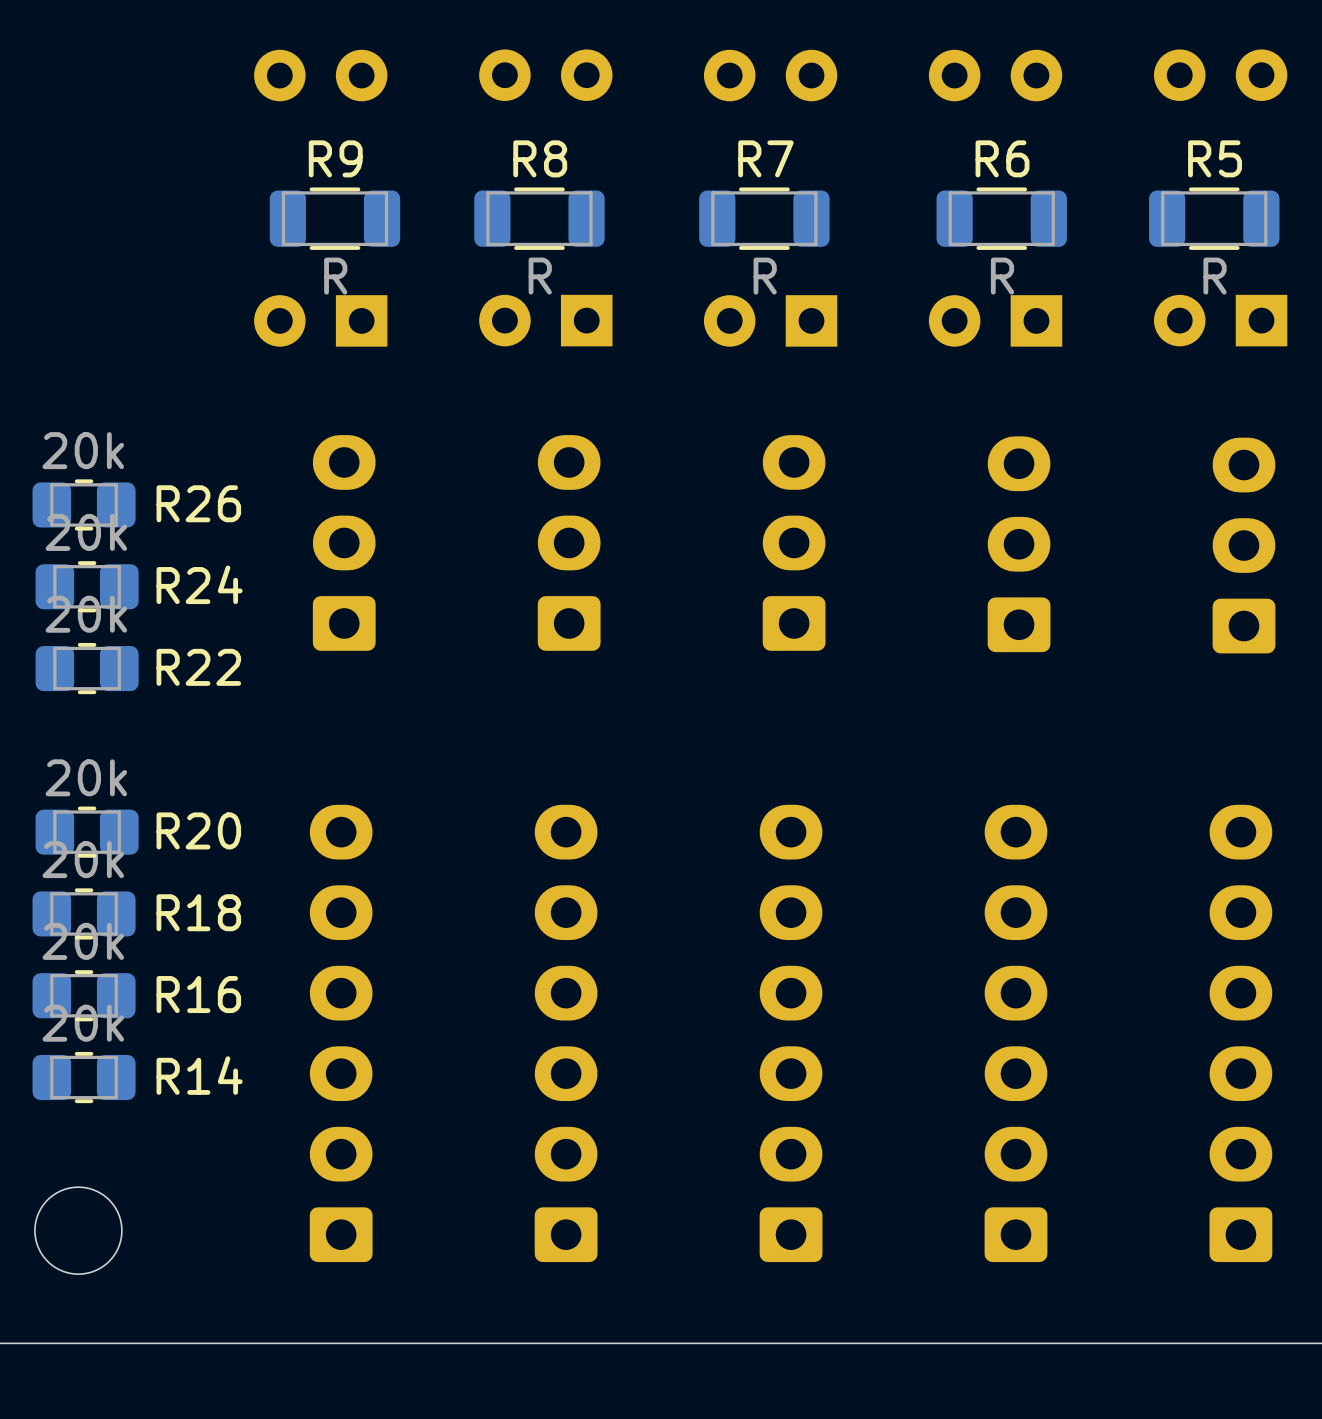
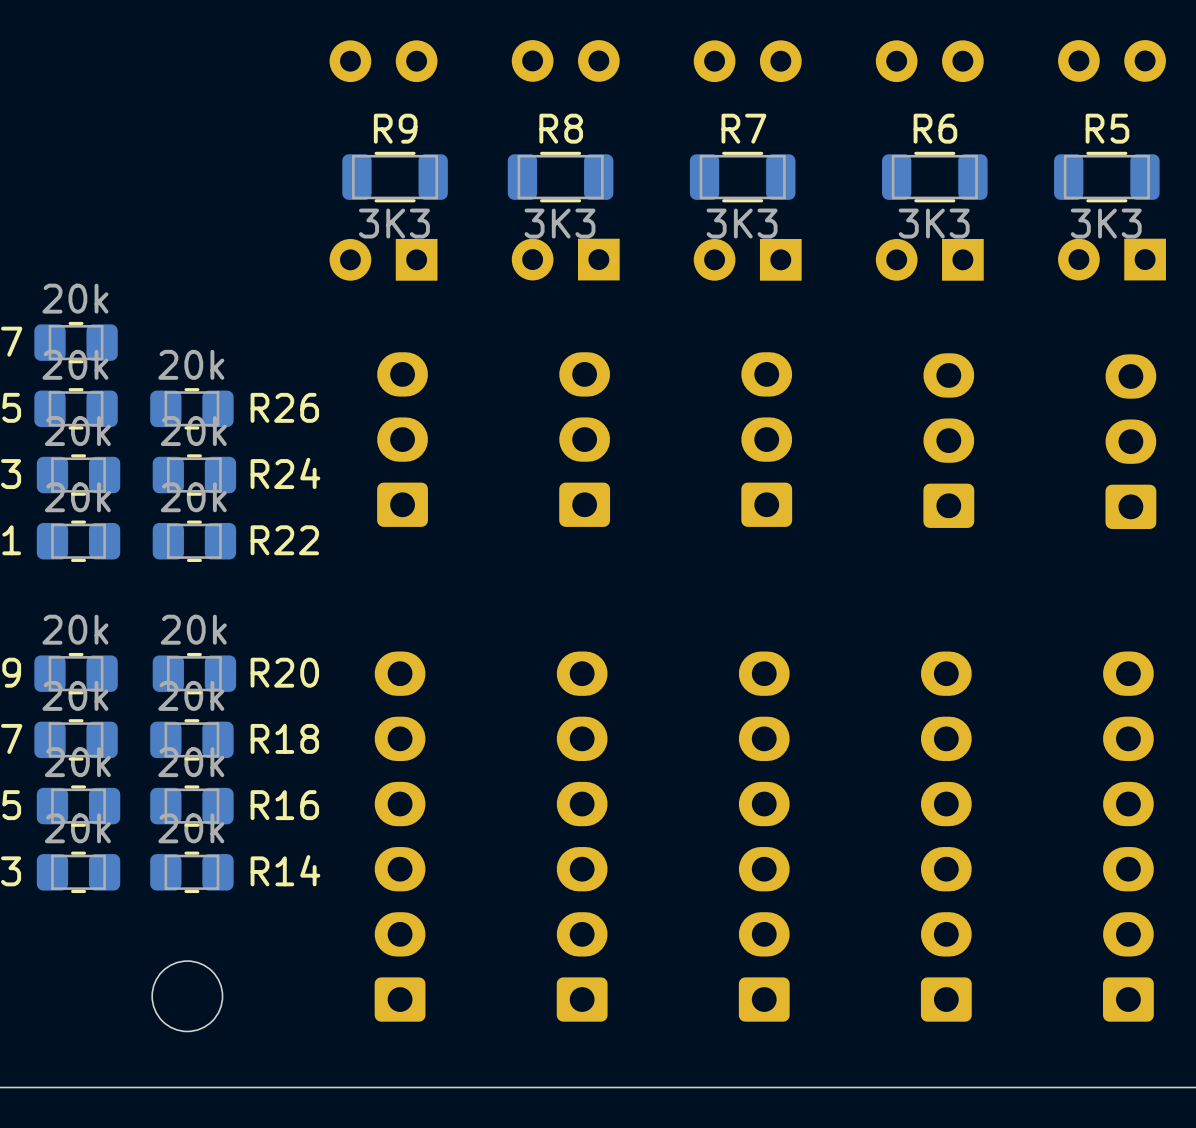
R9 value: R (335, 276) -> 3K3 (394, 223)
R8 value: R (540, 276) -> 3K3 (559, 223)
R7 value: R (765, 276) -> 3K3 (742, 223)
R6 value: R (1002, 276) -> 3K3 (934, 223)
R5 value: R (1215, 276) -> 3K3 (1106, 223)

